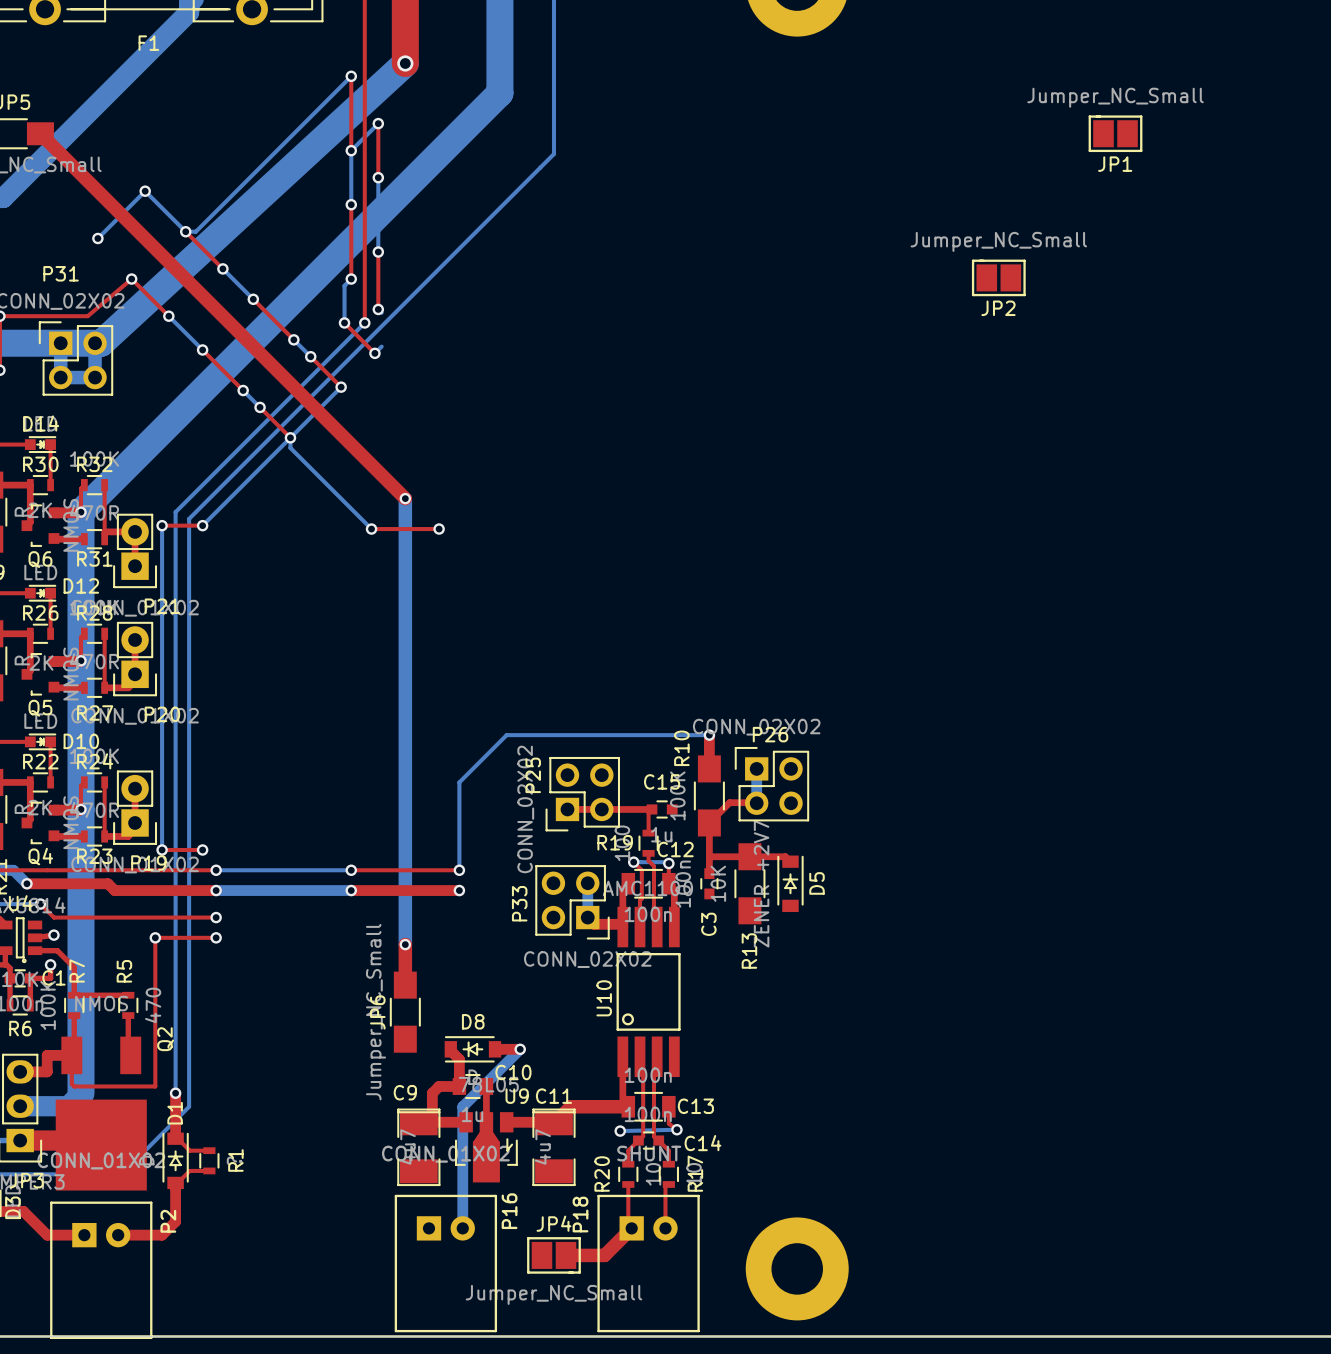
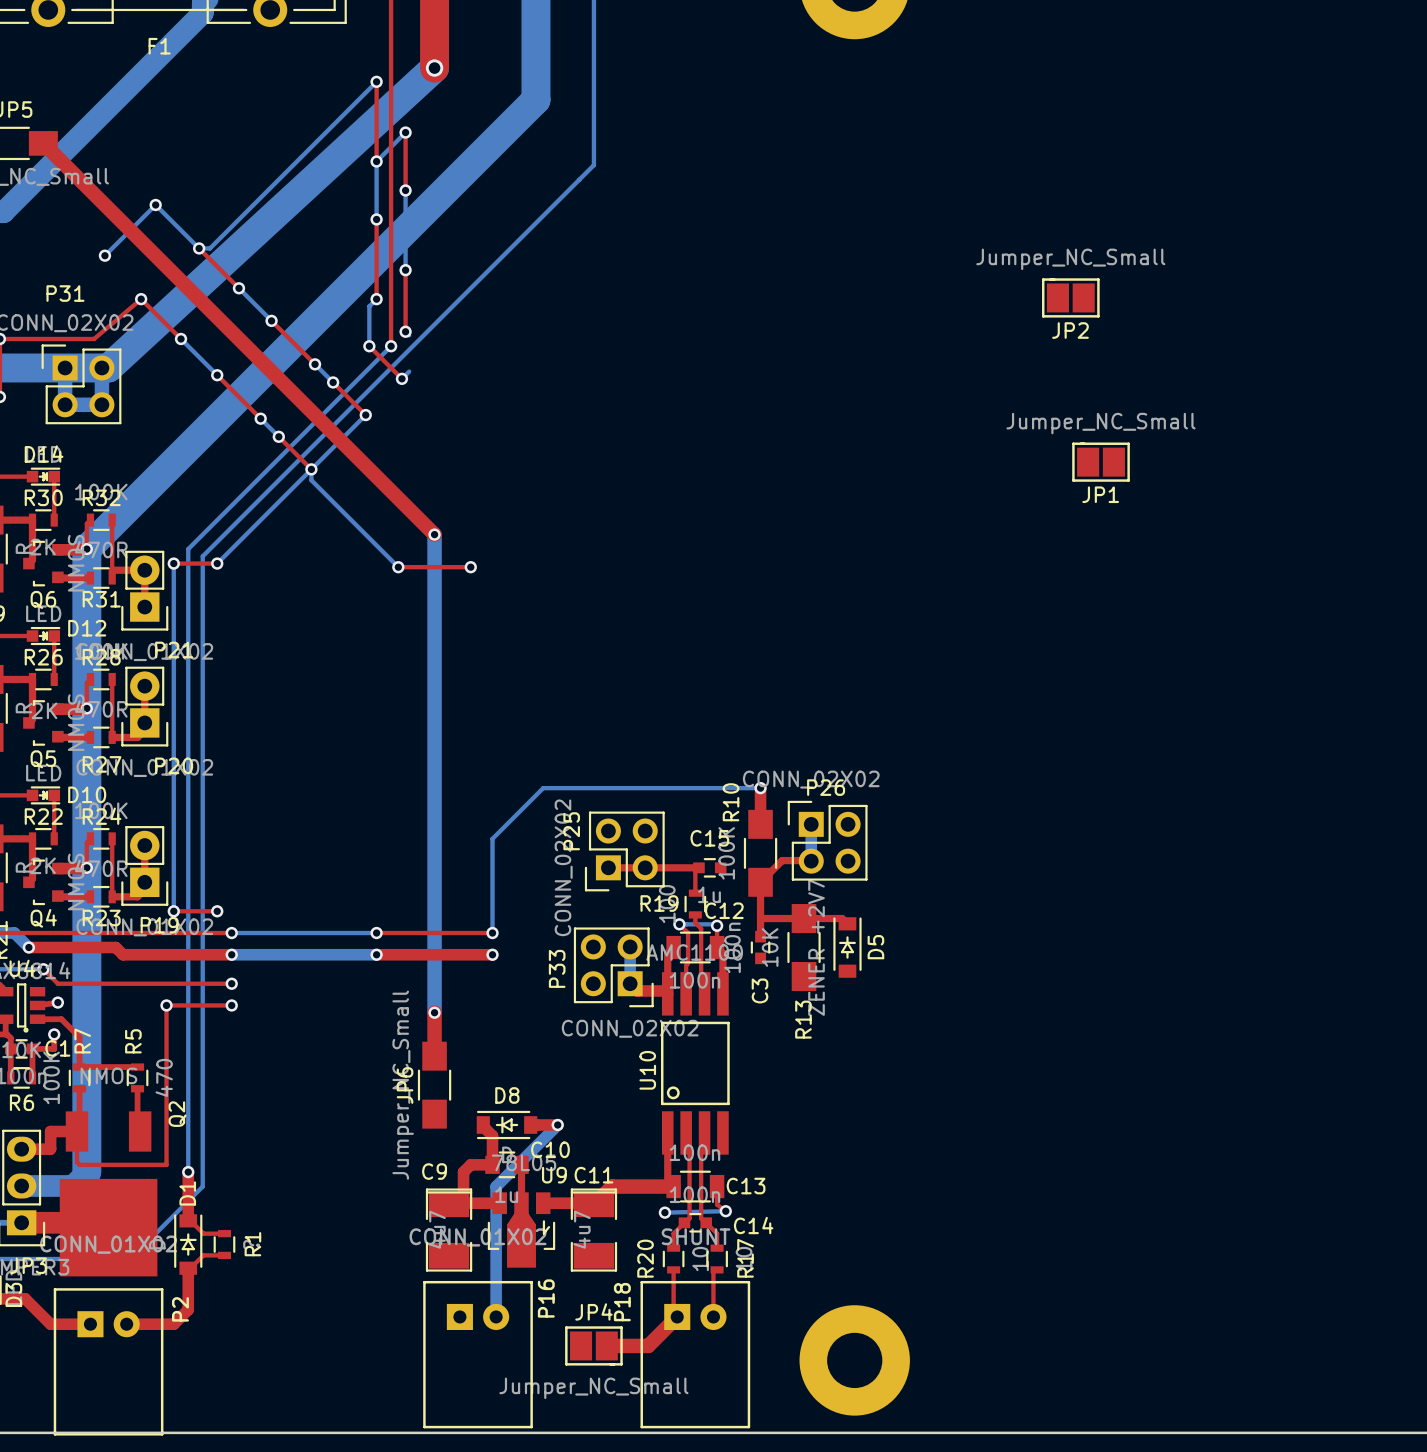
JP1 position: (1115, 133) -> (1101, 462)

